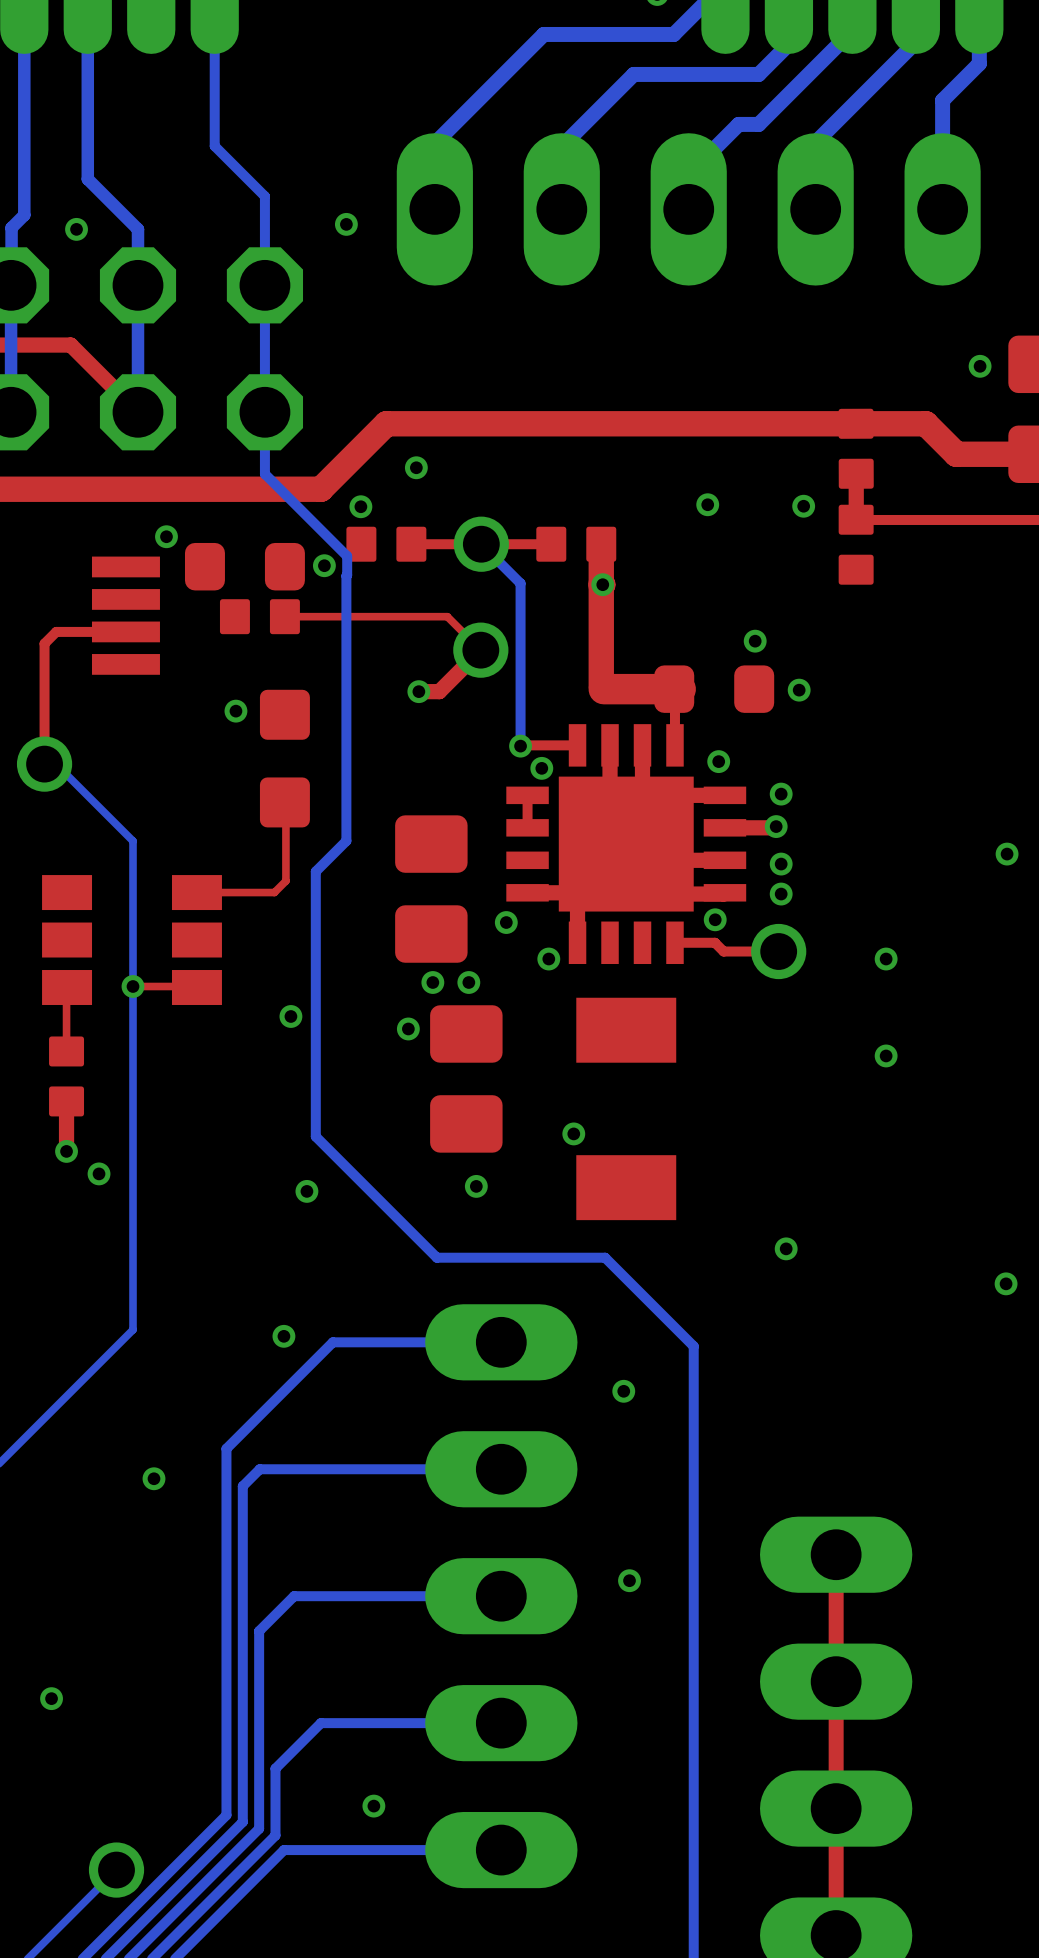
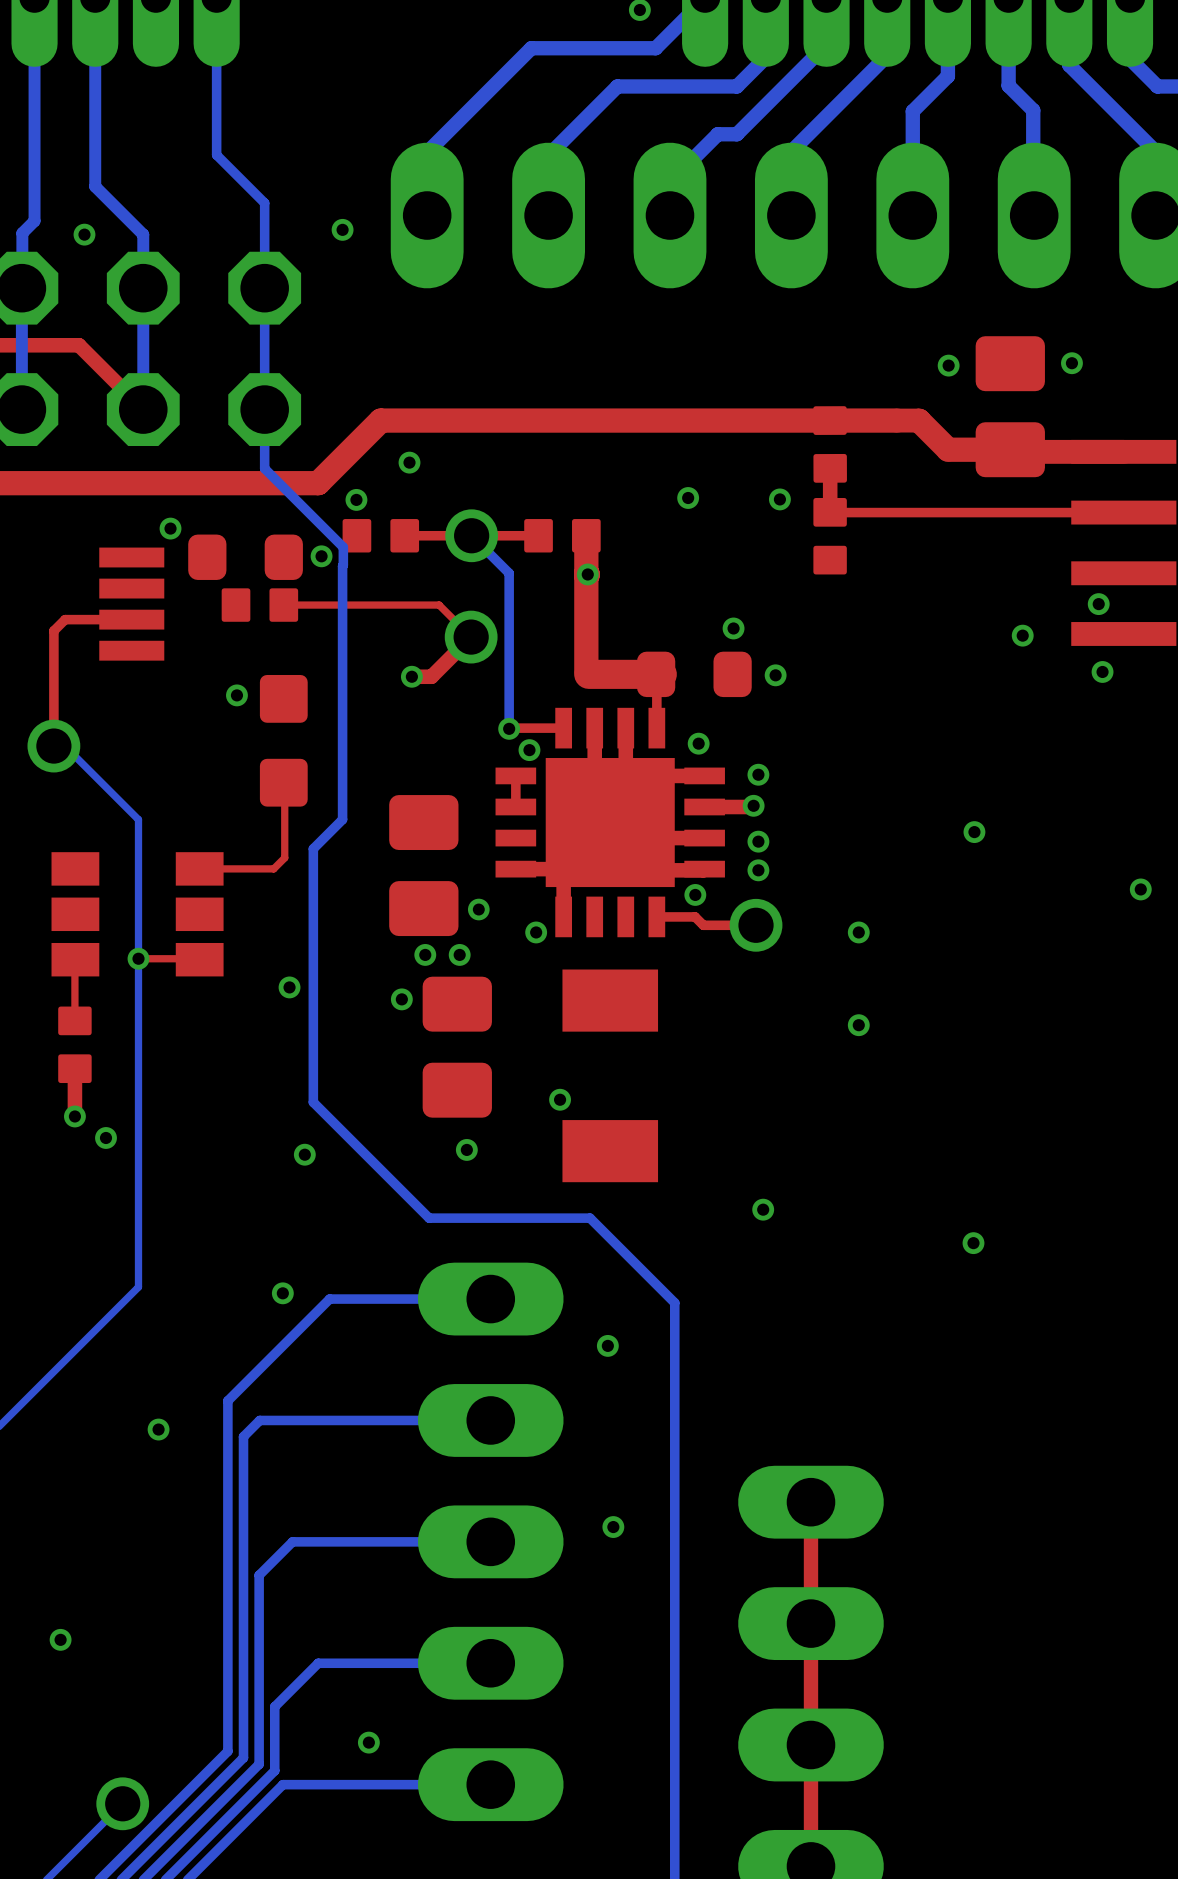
top track: (925, 423) (956, 454) (979, 454) -> (896, 420) (919, 420) (948, 449)
via position: (506, 922) -> (478, 909)

